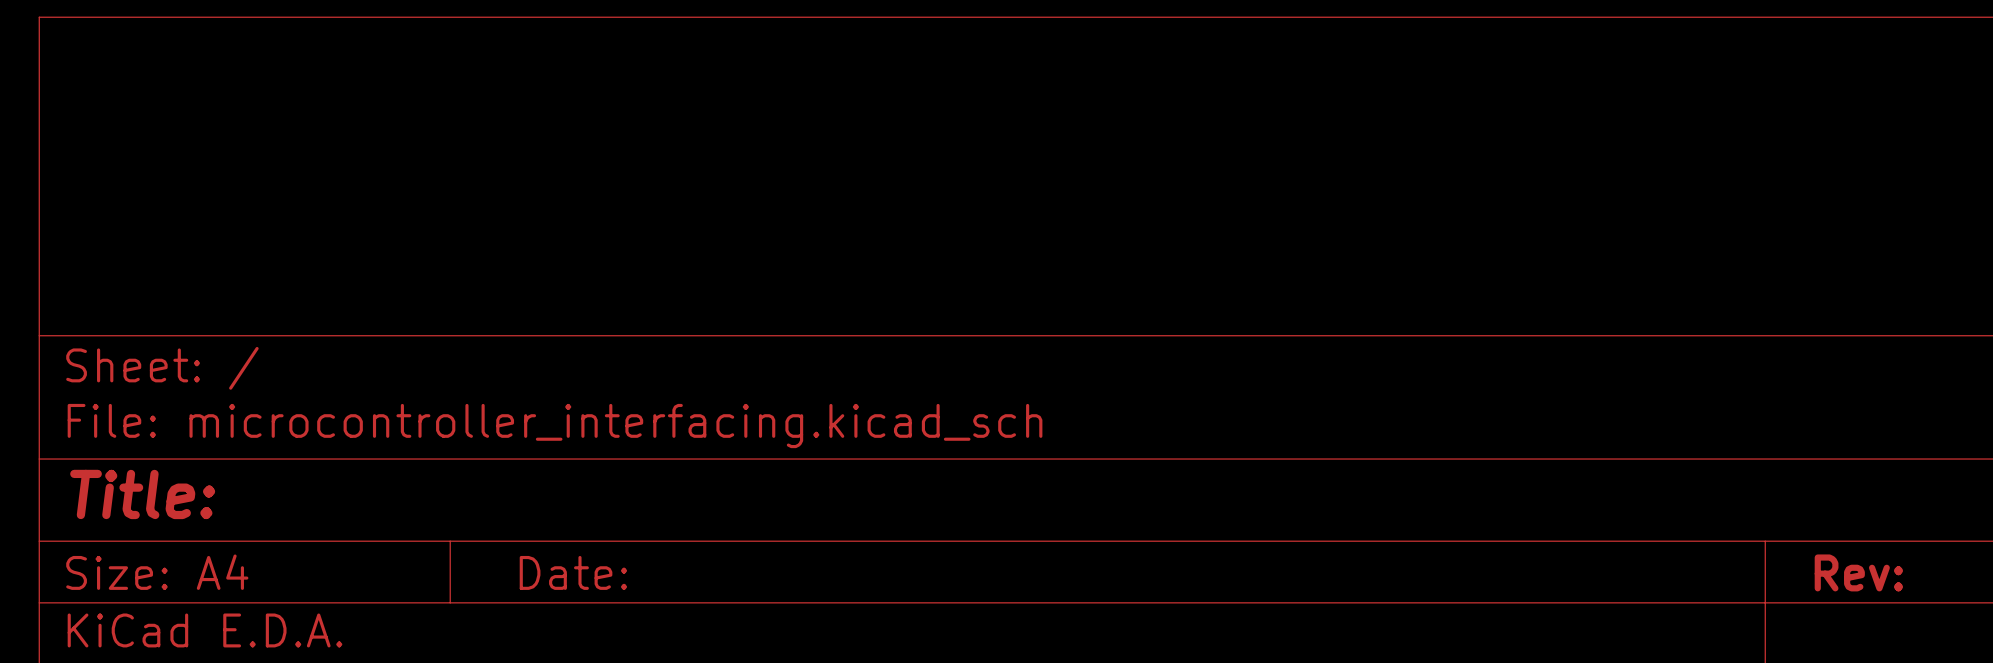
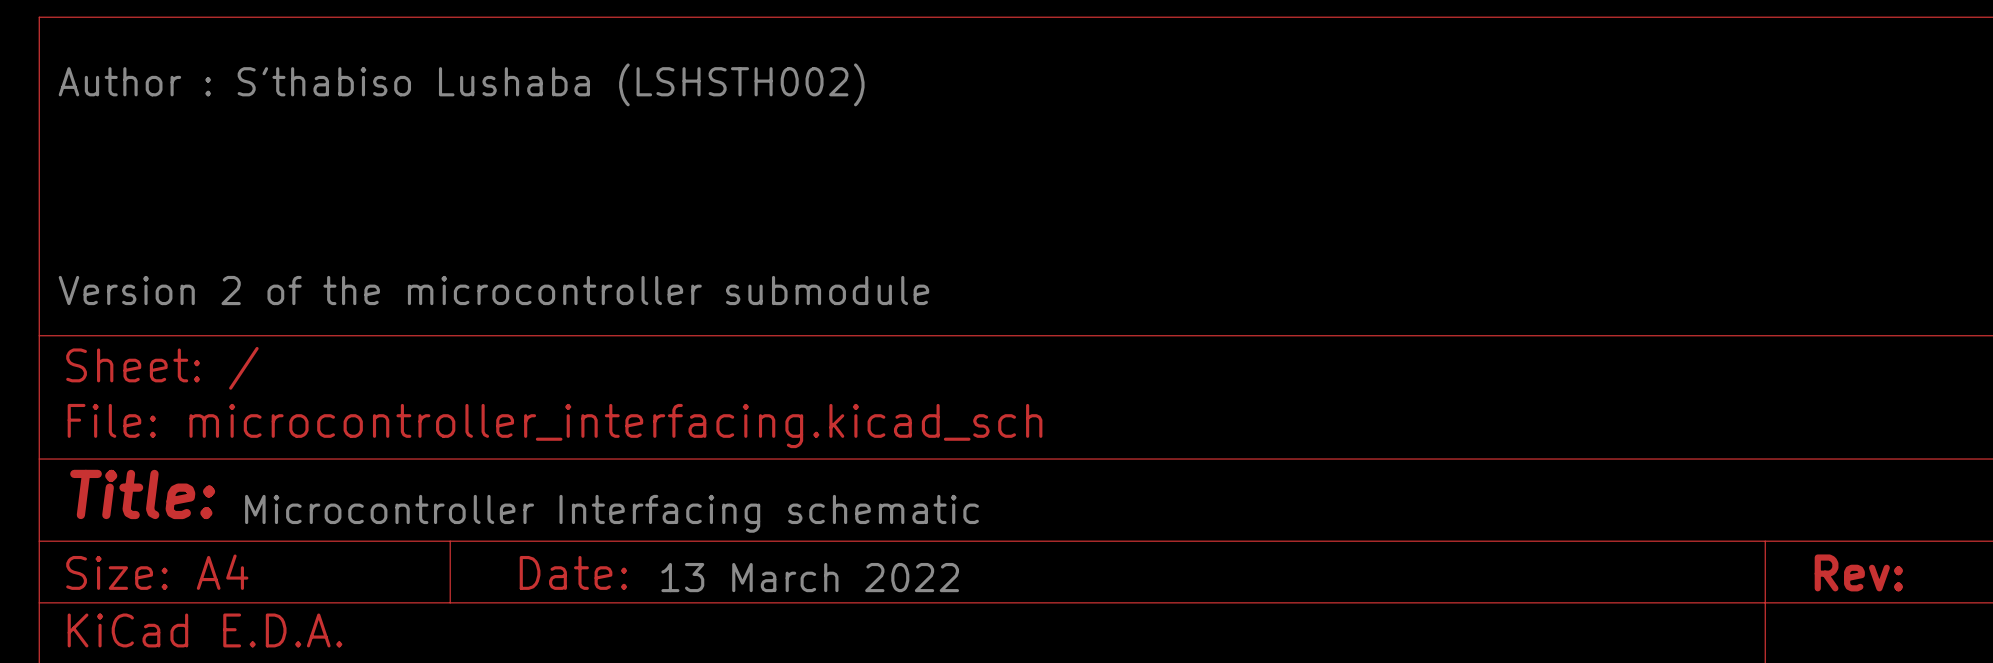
text: none -> Author : S'thabiso Lushaba (LSHSTH002) (461, 84)
text: none -> Version 2 of the microcontroller submodule (493, 290)
text: none -> Microcontroller Interfacing schematic (612, 513)
text: none -> 13 March 2022 (810, 577)

